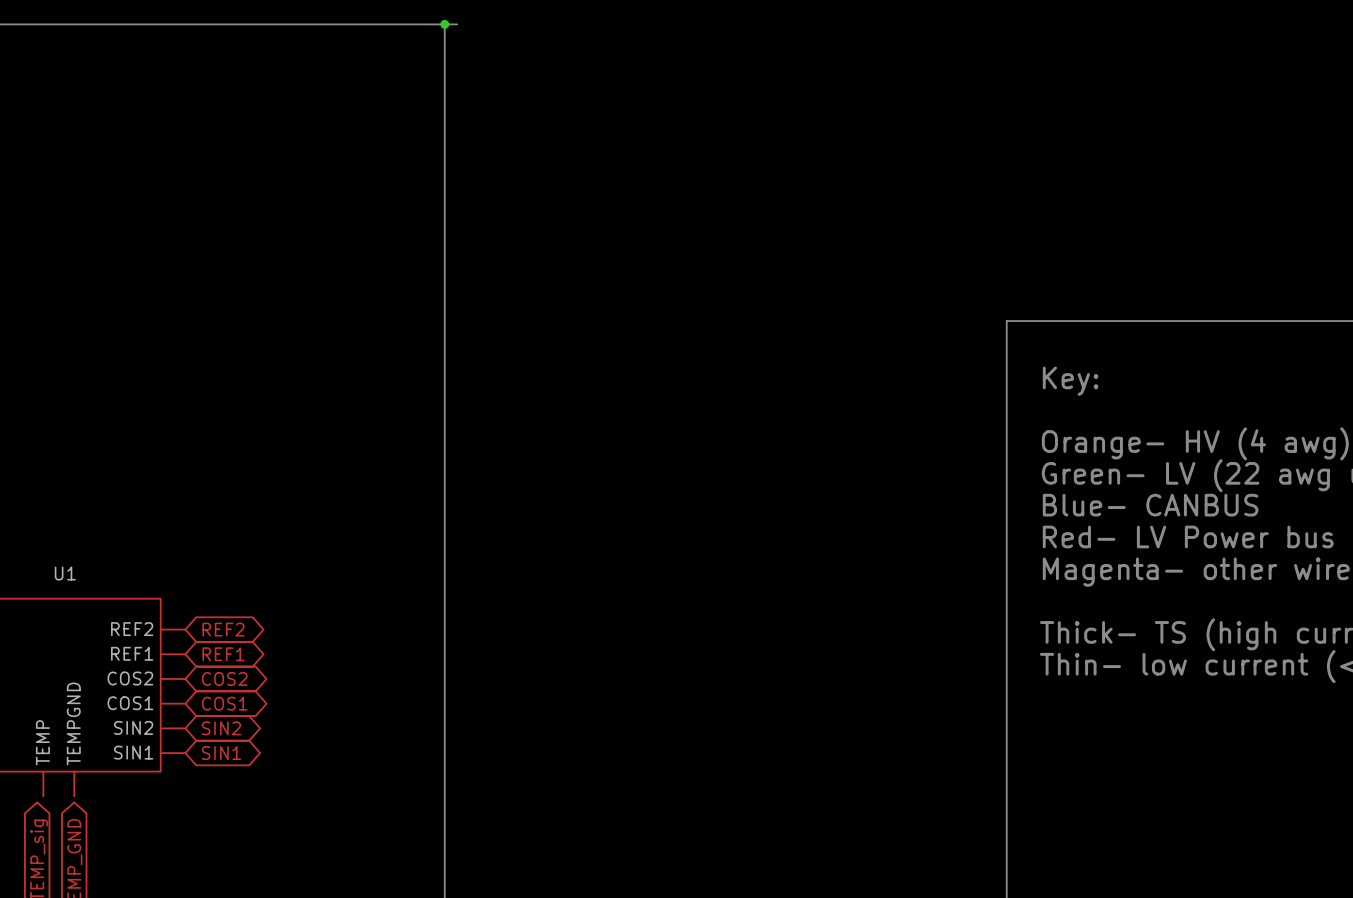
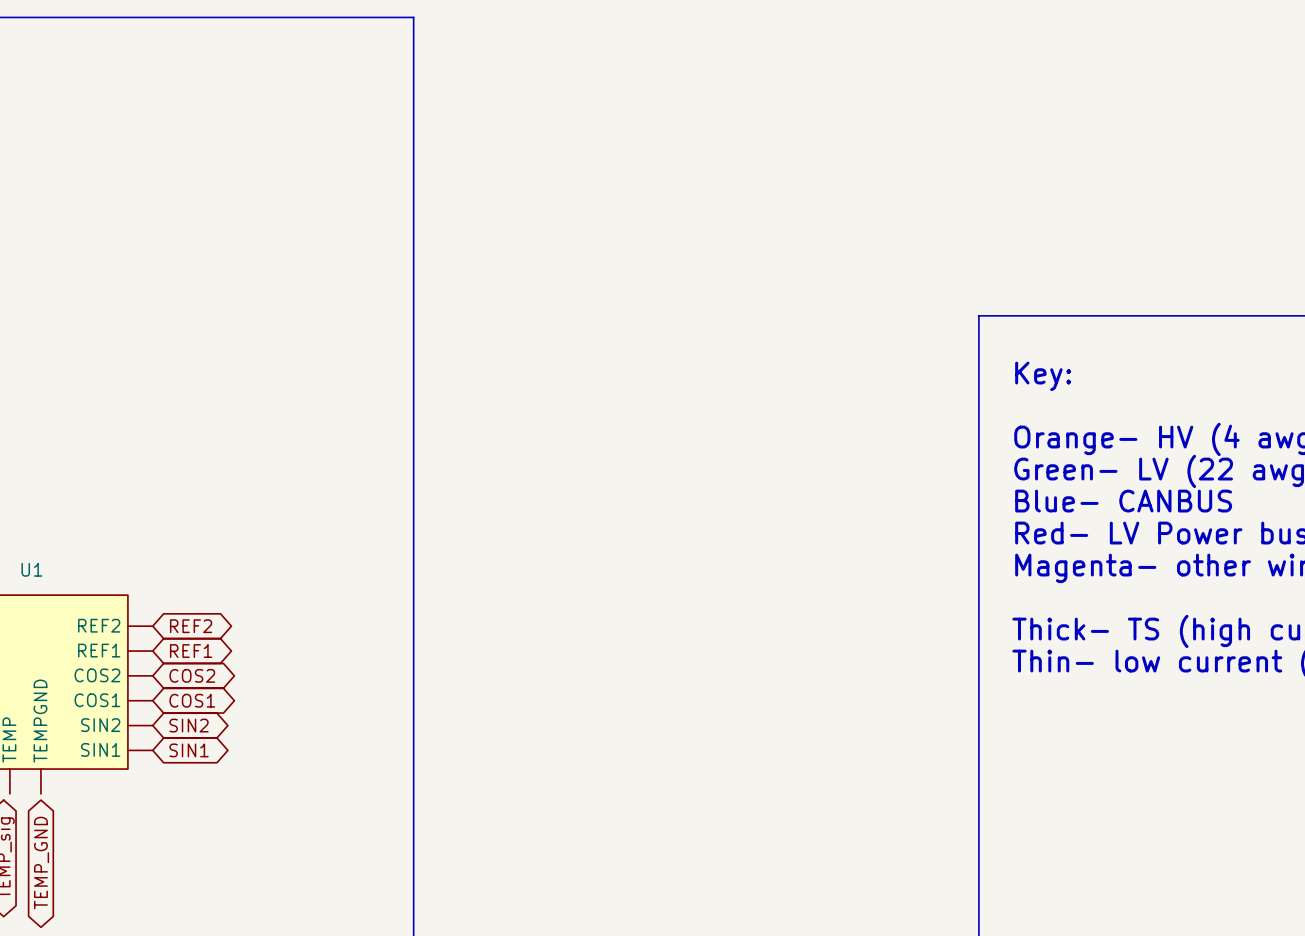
bus: (444, 24) (457, 24) -> none
junction: (444, 24) -> none

